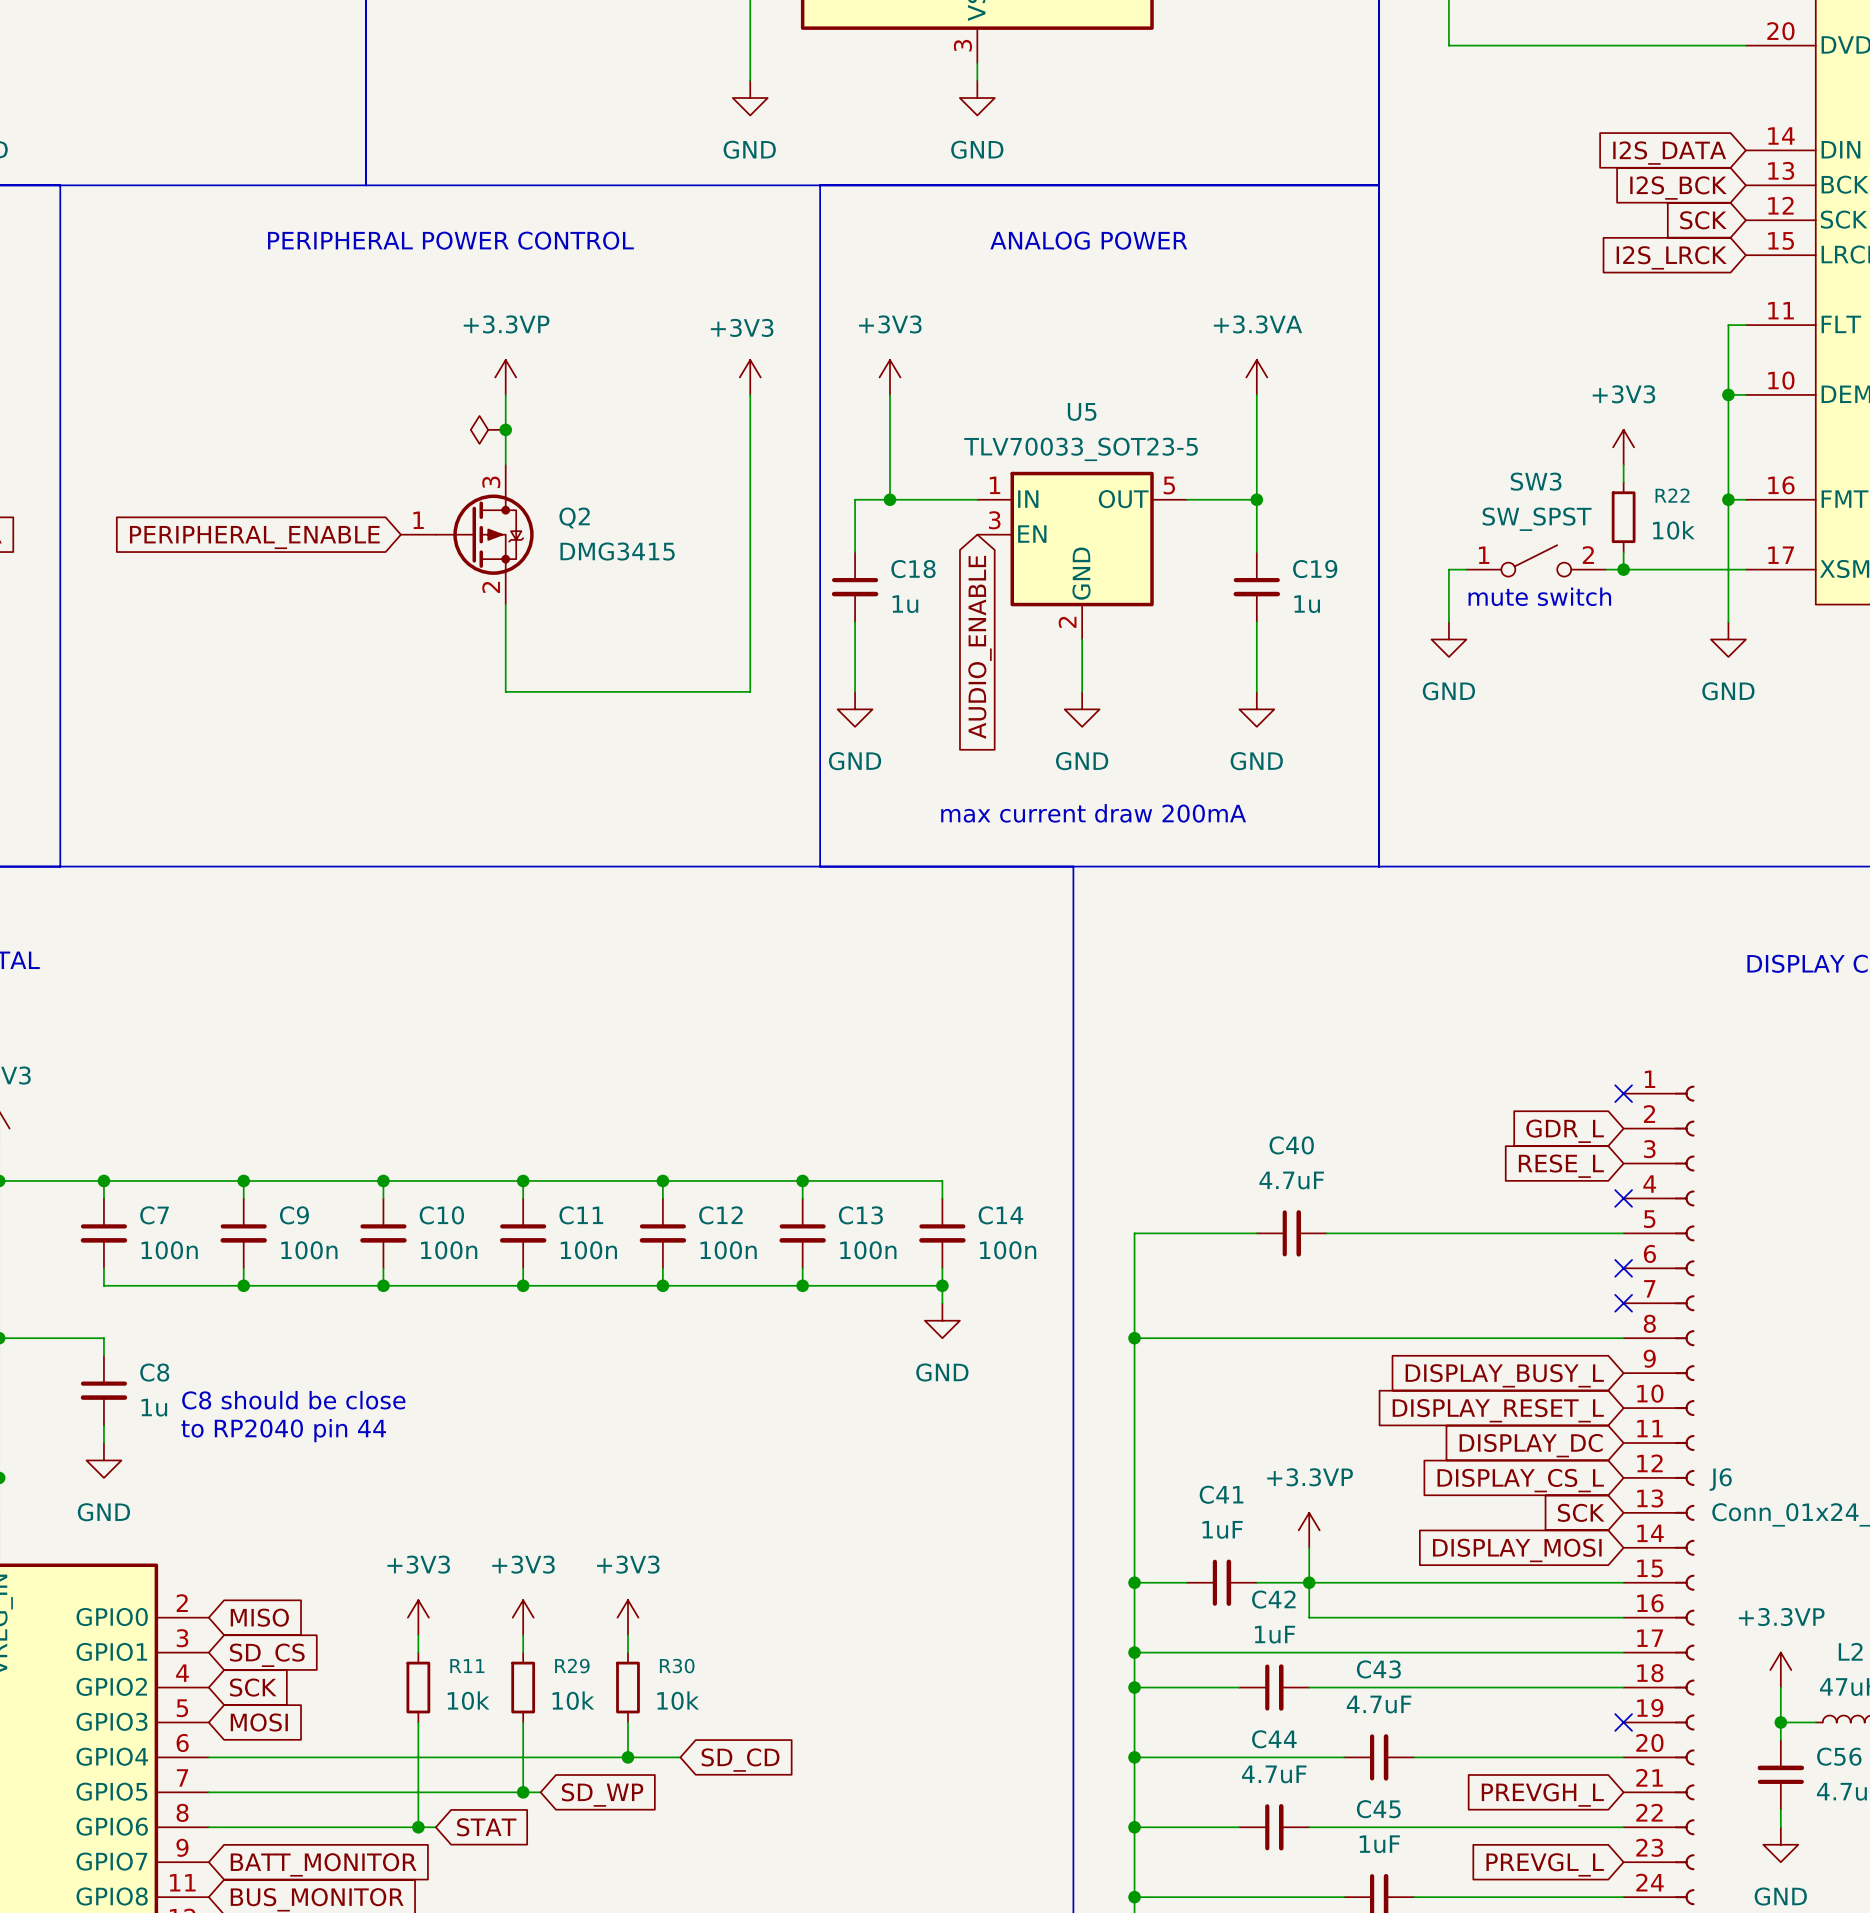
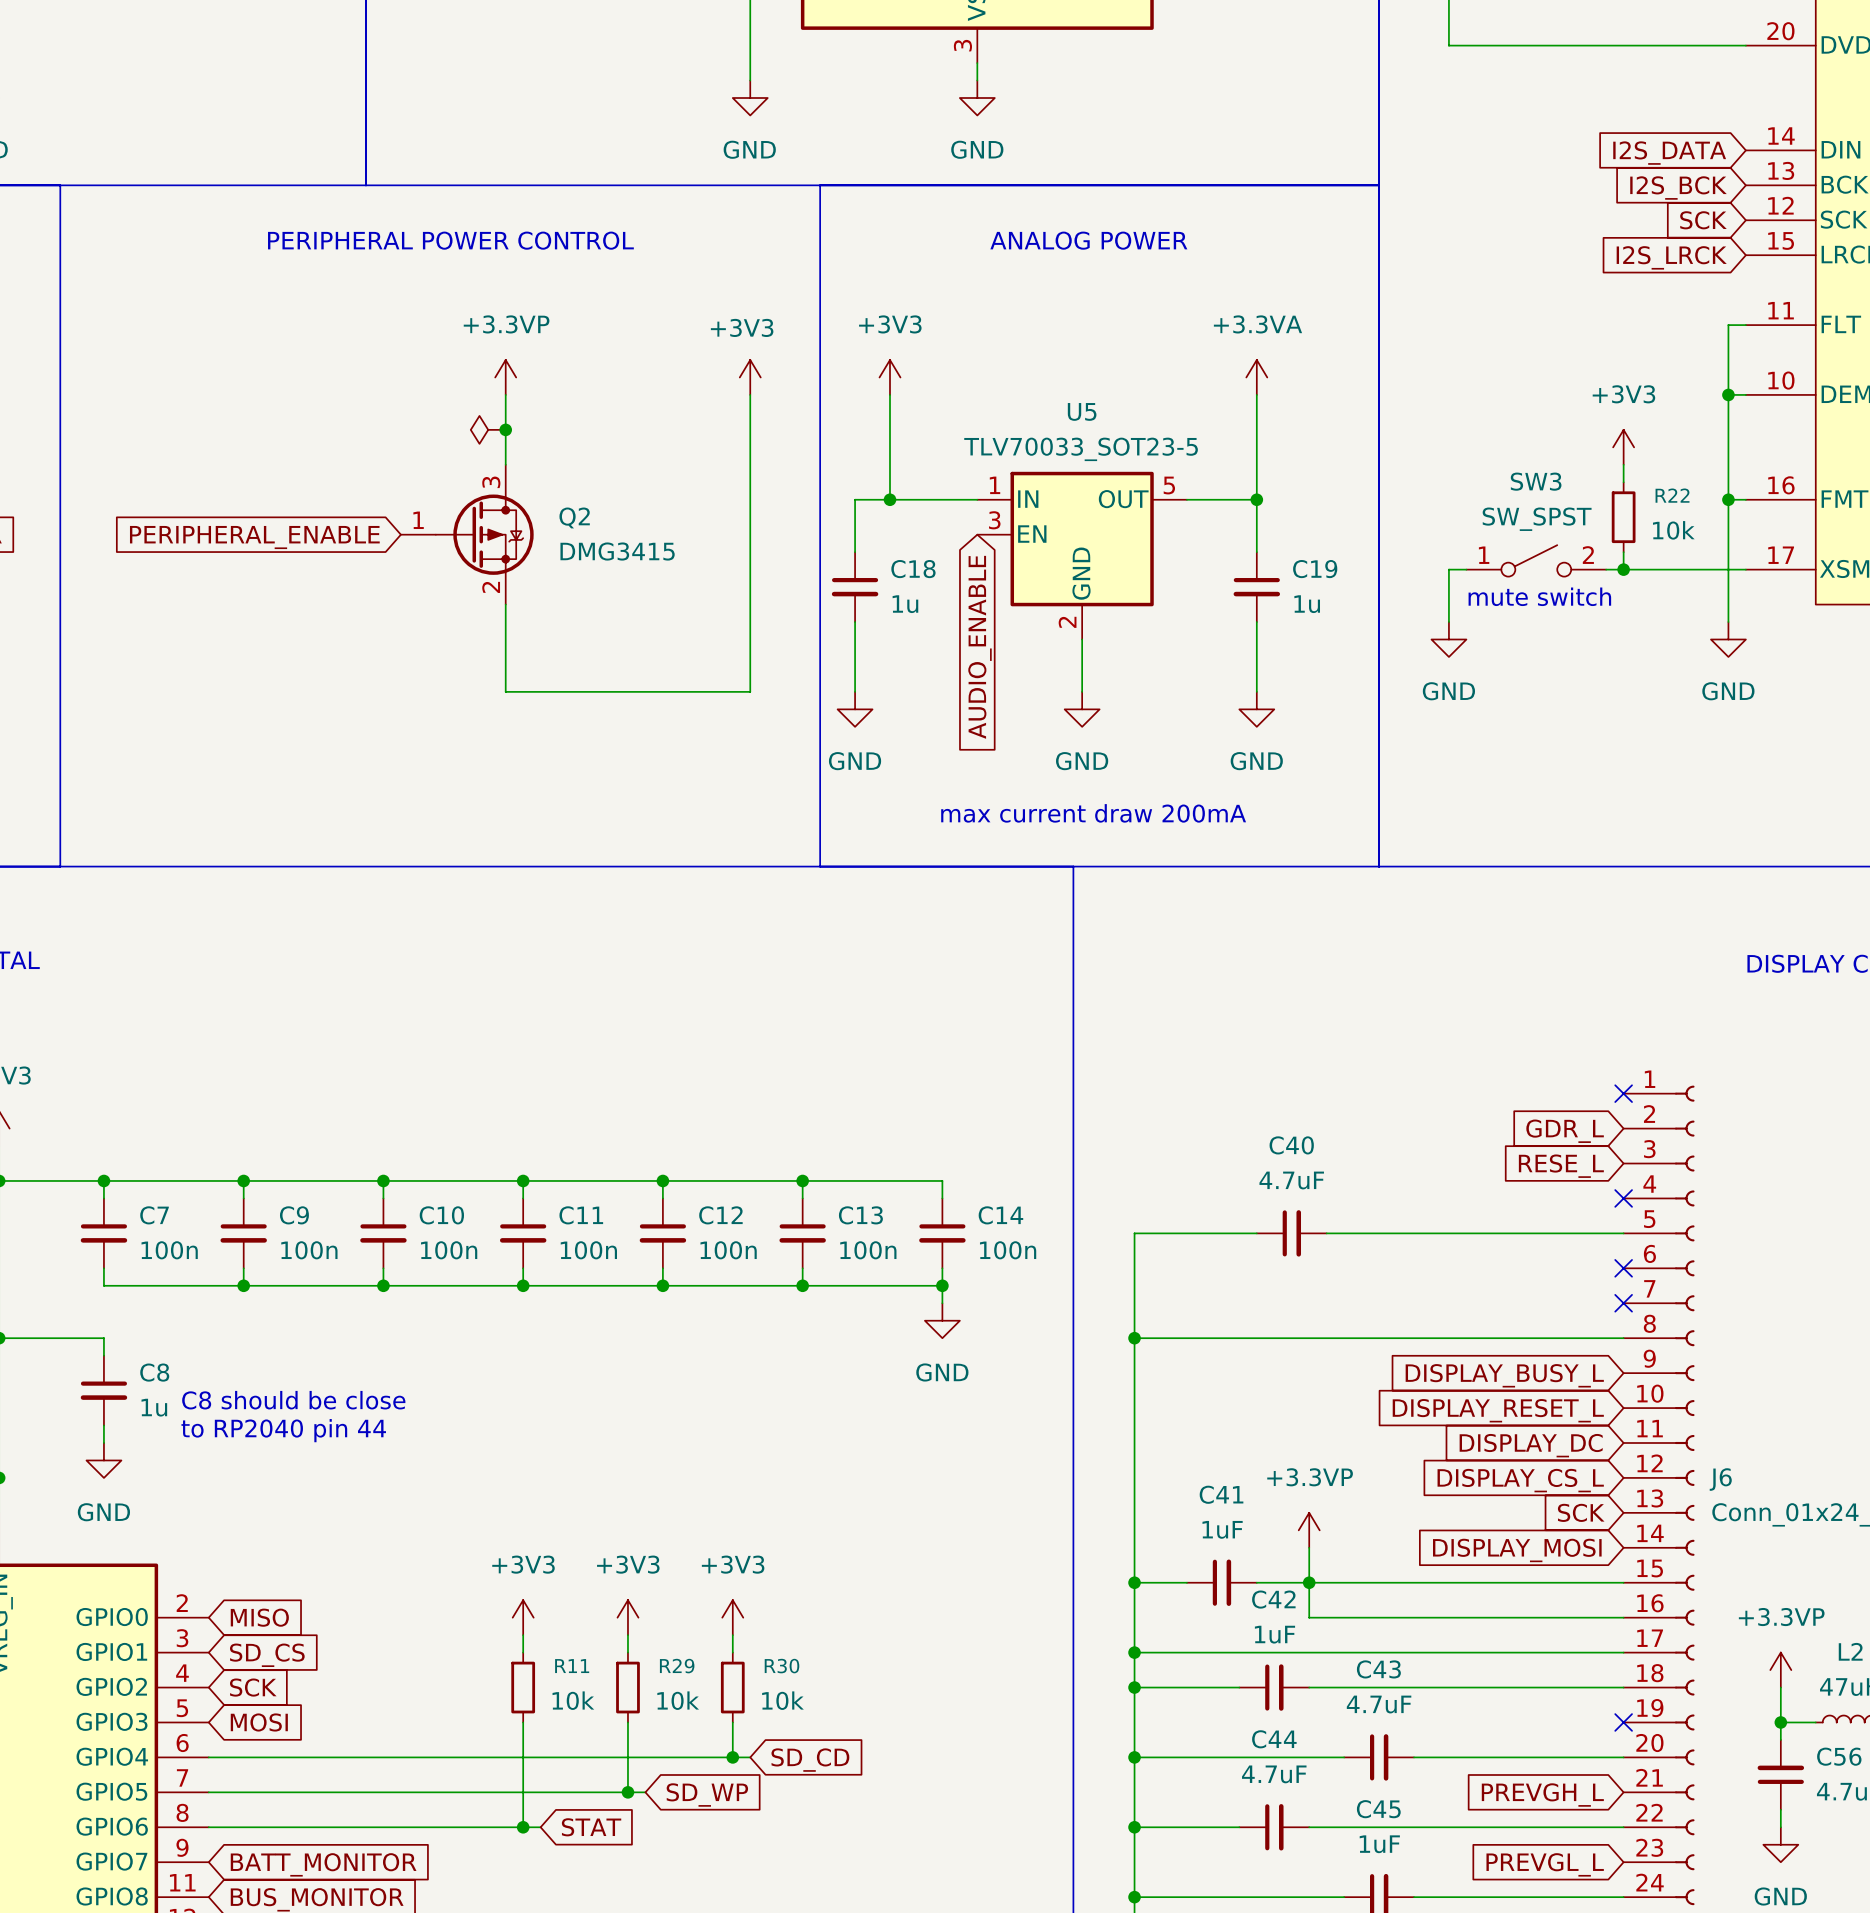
power symbol position: +3V3 (418, 1617) -> +3V3 (732, 1617)
wire: (418, 1635) (418, 1652) -> (732, 1635) (732, 1652)
R29 name: R29 (572, 1666) -> R11 (572, 1666)
R30 name: R30 (677, 1666) -> R29 (677, 1666)
R11: 10k (418, 1687) -> none
R30: none -> 10k (732, 1687)
wire: (418, 1722) (418, 1827) -> none
wire: none -> (732, 1722) (732, 1757)
wire: none -> (627, 1757) (627, 1792)
junction position: (627, 1757) -> (627, 1792)
wire: none -> (680, 1757) (750, 1757)
junction: none -> (732, 1757)
global label position: SD_CD (740, 1760) -> SD_CD (810, 1760)
wire: none -> (523, 1792) (523, 1827)
junction position: (523, 1792) -> (523, 1827)
wire: none -> (540, 1792) (645, 1792)
global label position: SD_WP (602, 1795) -> SD_WP (707, 1795)
junction: (418, 1827) -> none
wire: none -> (435, 1827) (540, 1827)
global label position: STAT (486, 1827) -> STAT (591, 1827)

